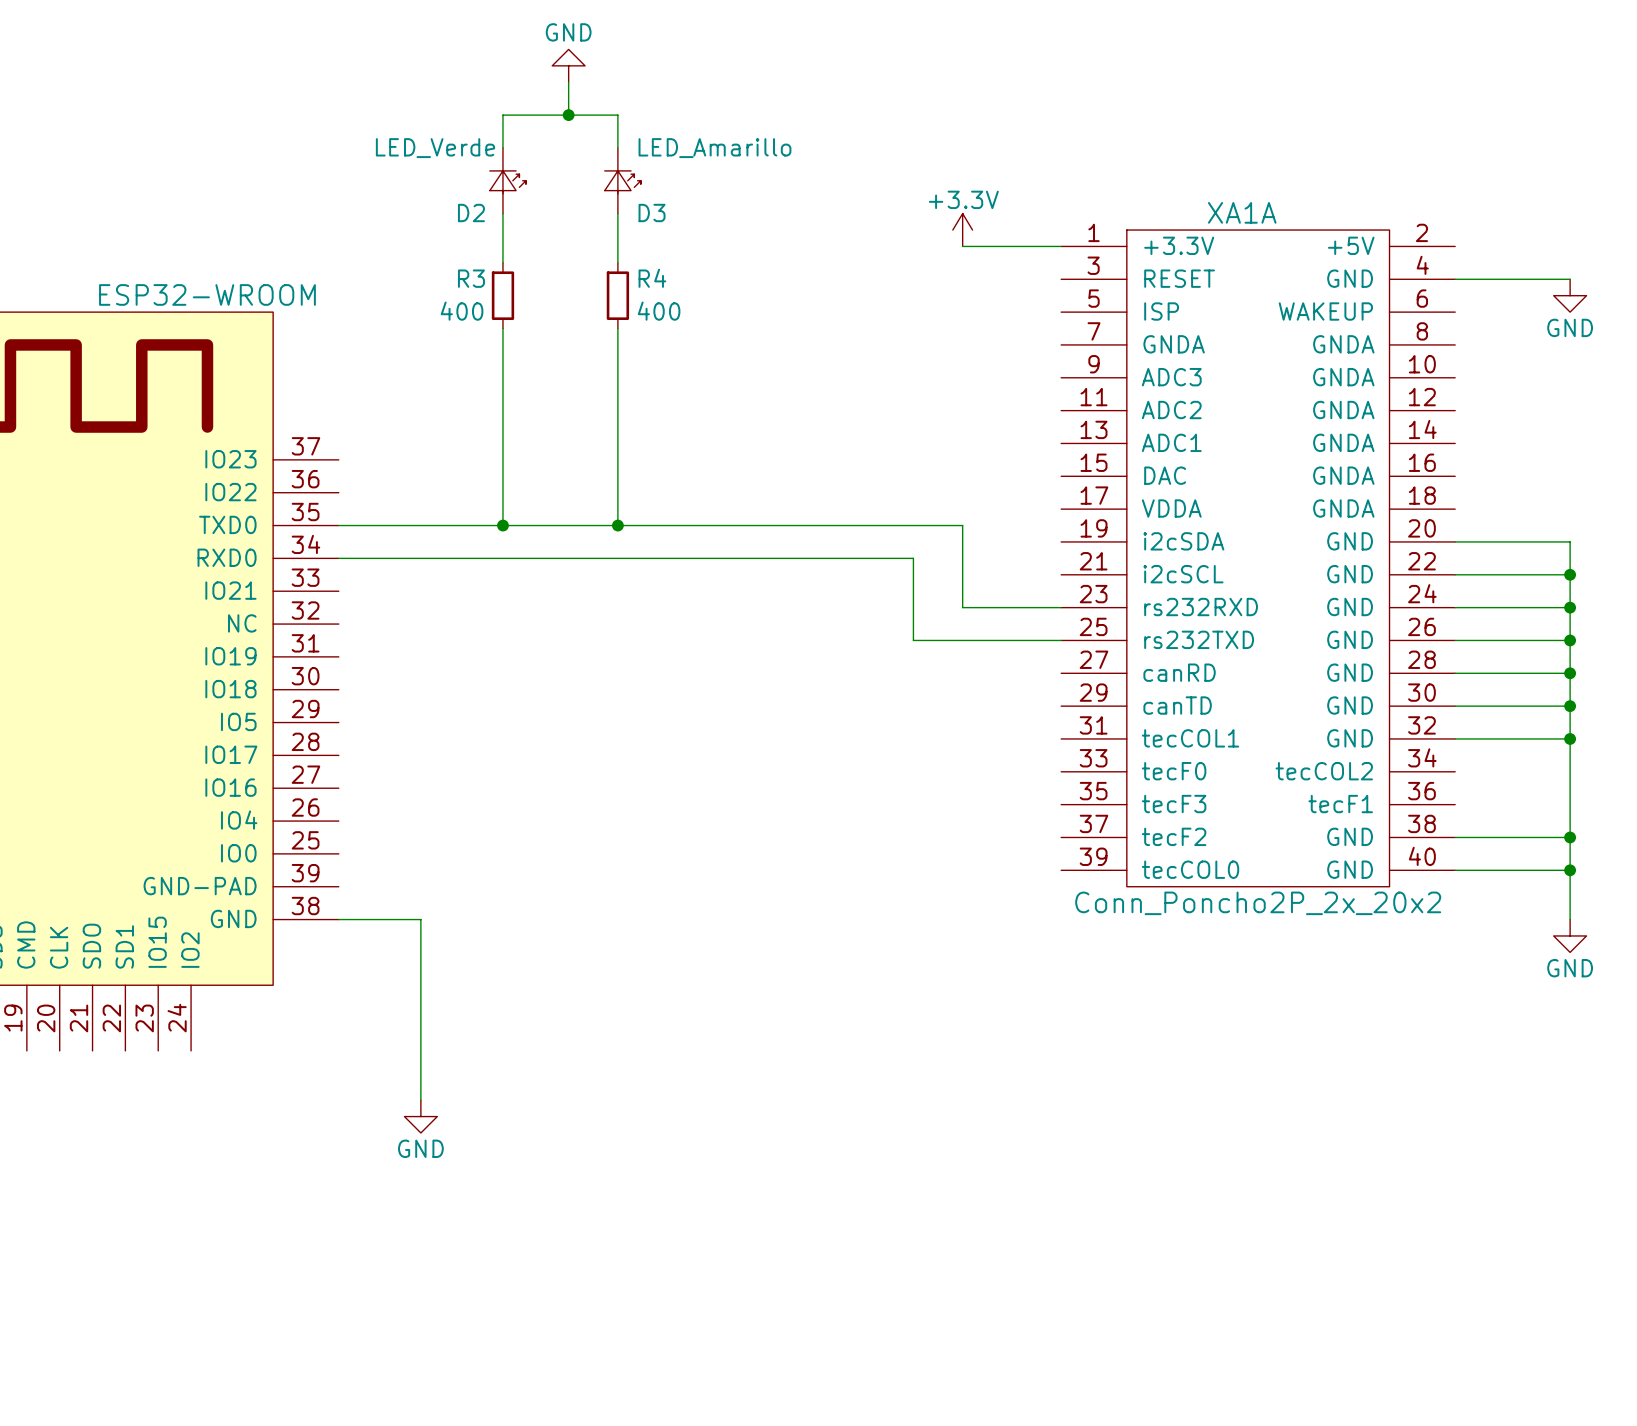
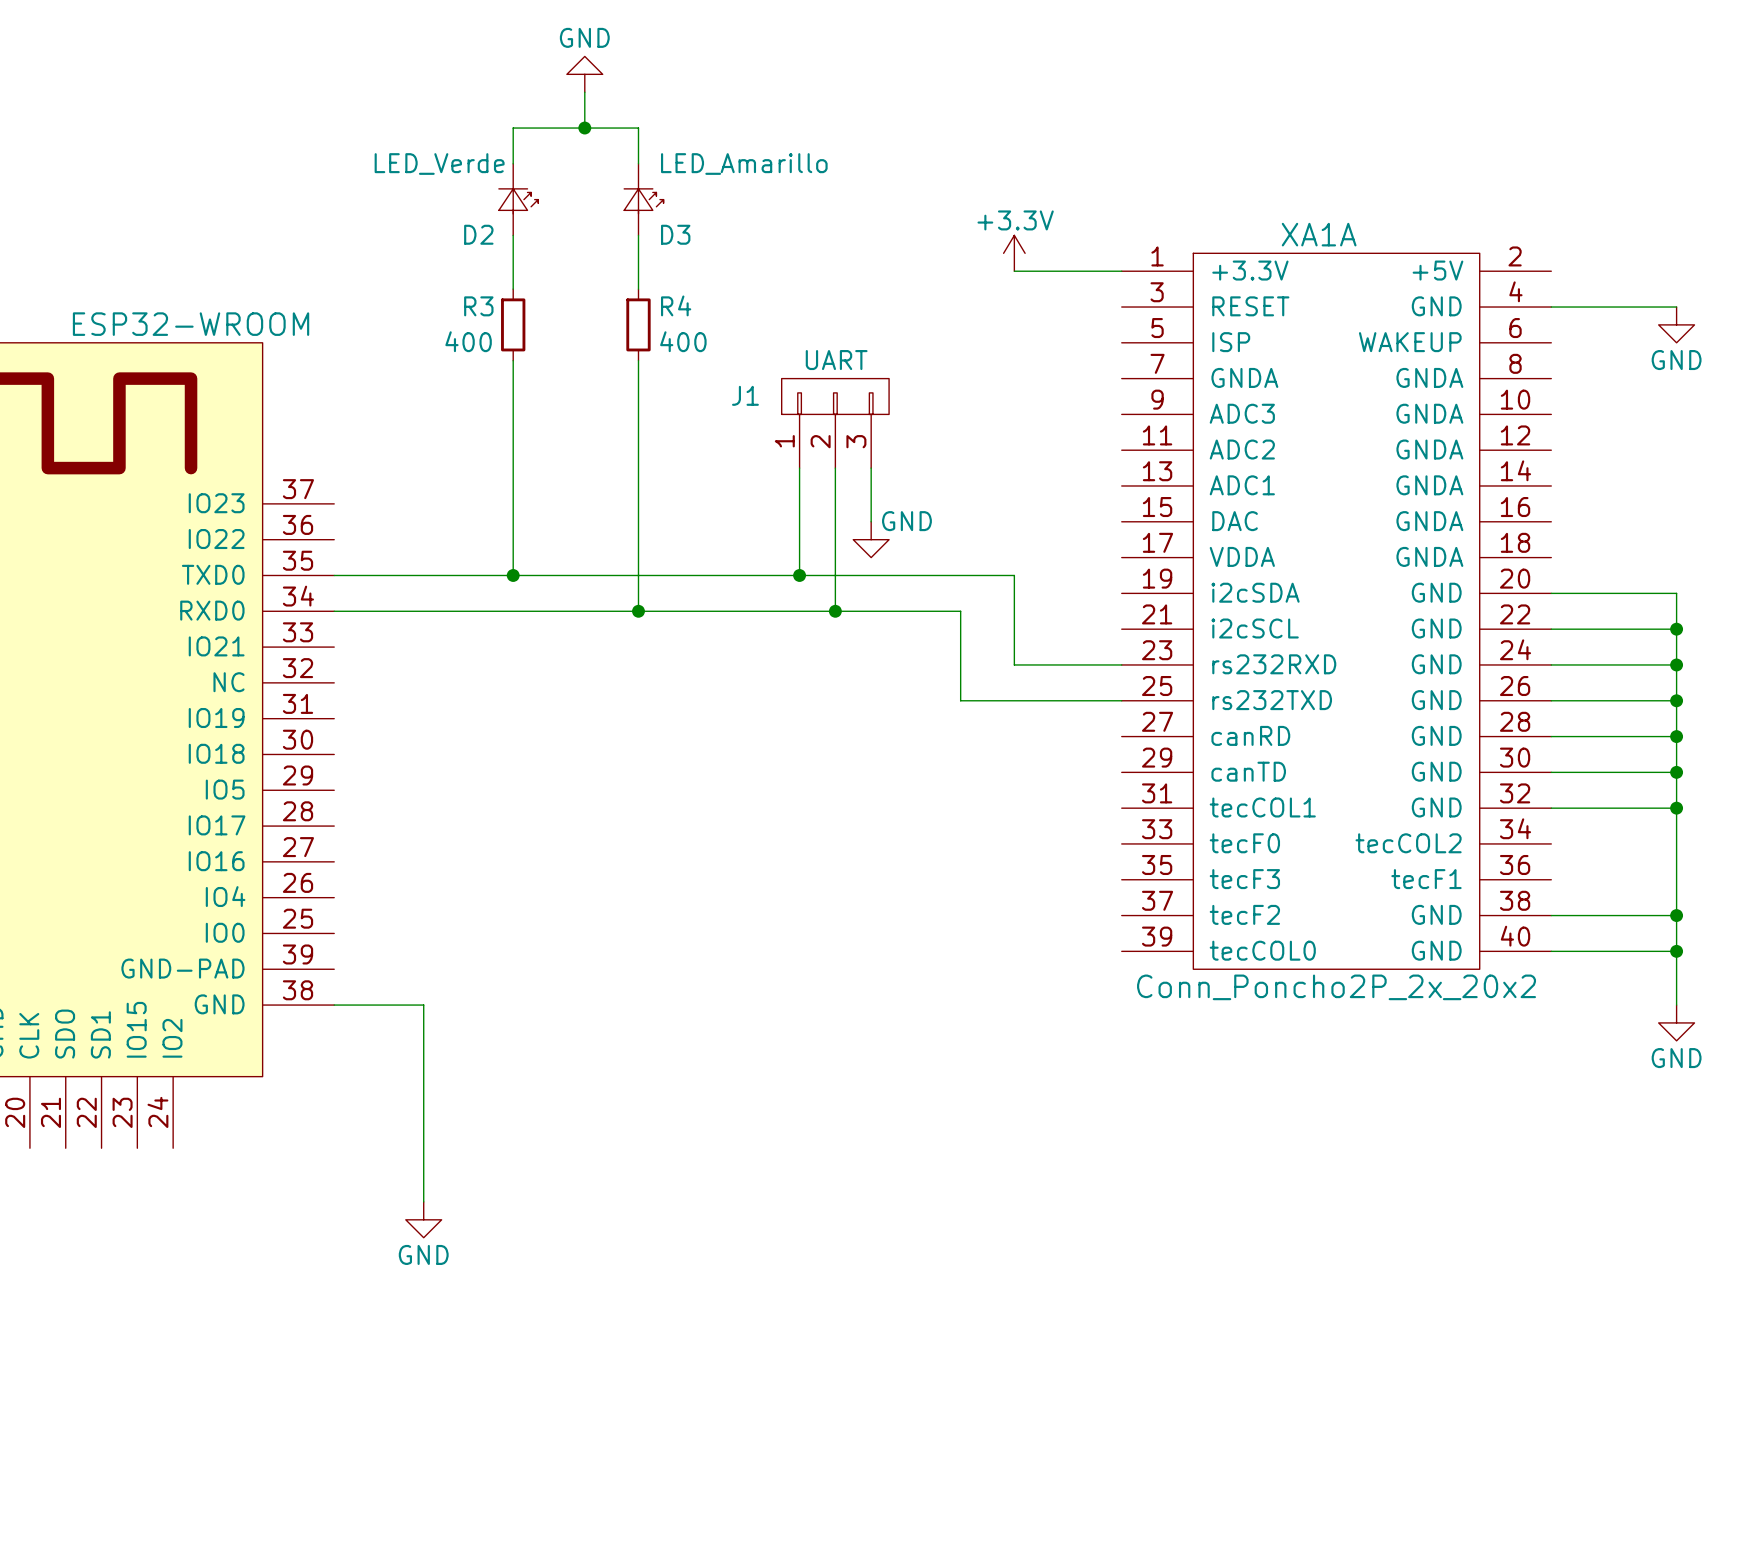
J1: none -> UART (835, 423)
wire: none -> (799, 468) (799, 575)
wire: none -> (835, 468) (835, 611)
wire: none -> (871, 468) (871, 521)
power symbol: none -> GND (871, 539)
wire: none -> (638, 575) (638, 611)
junction position: (617, 525) -> (638, 611)
junction: none -> (799, 575)
junction: none -> (835, 611)

